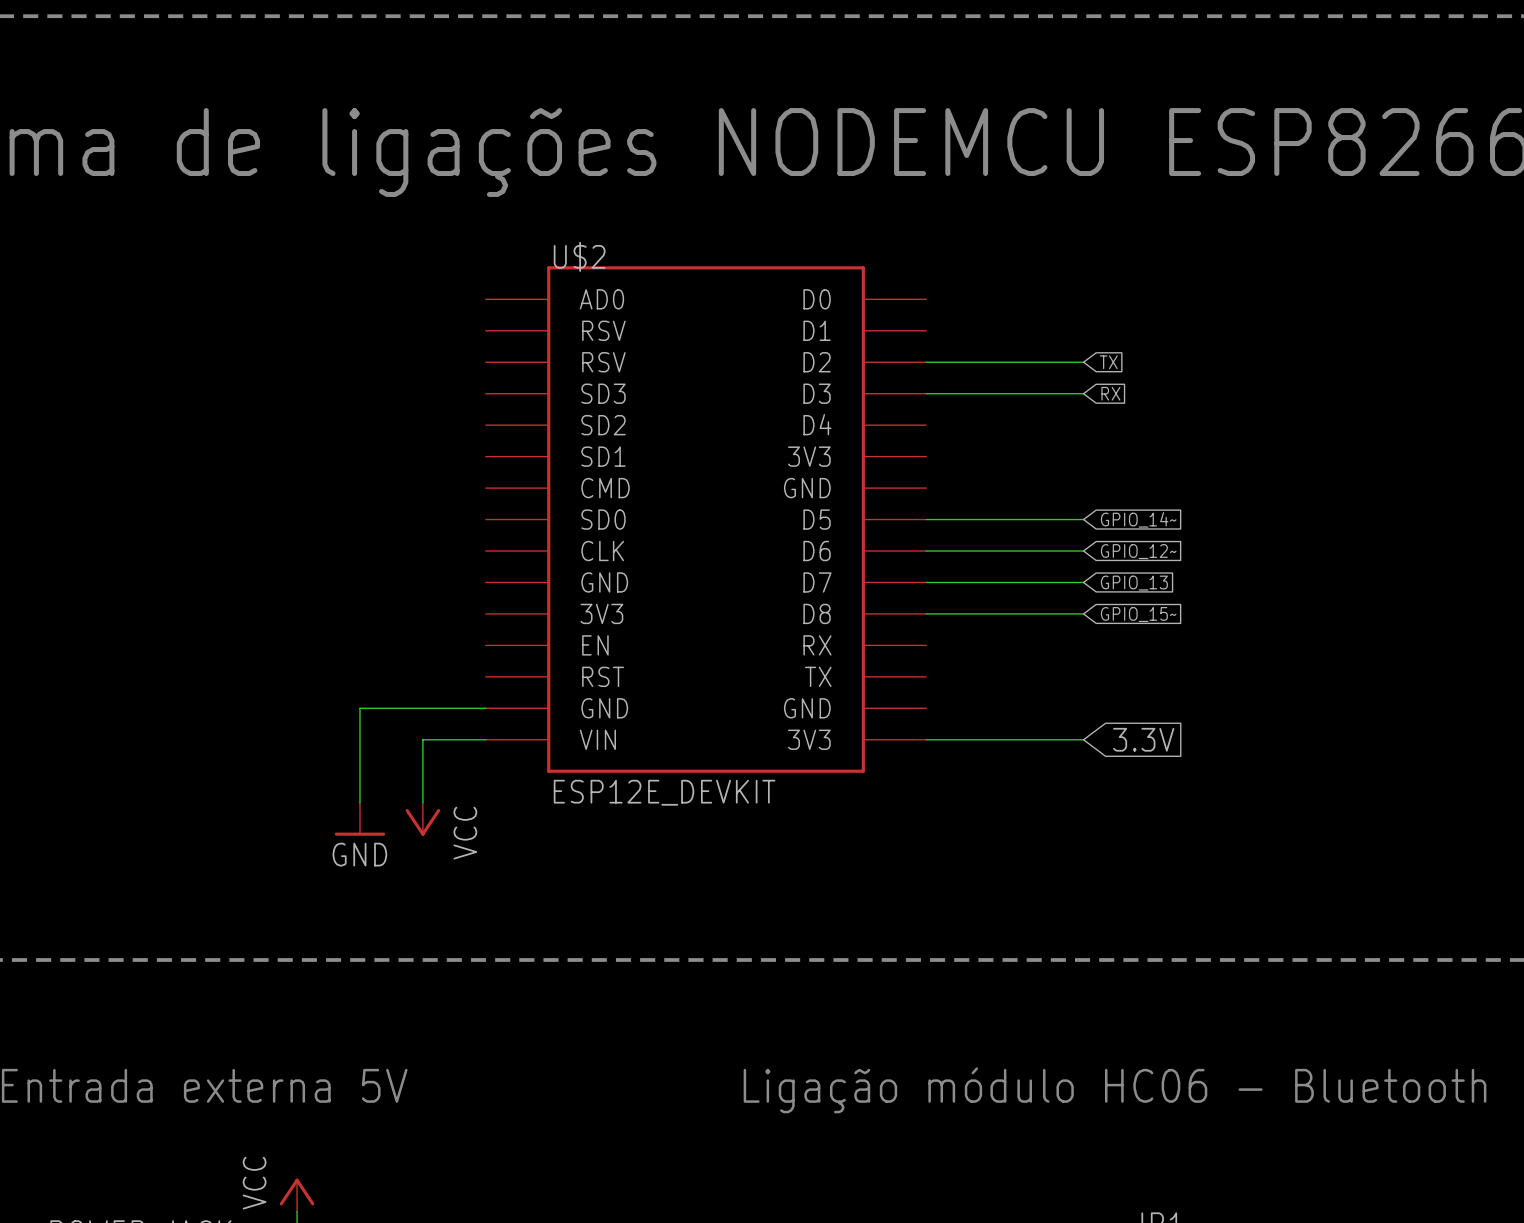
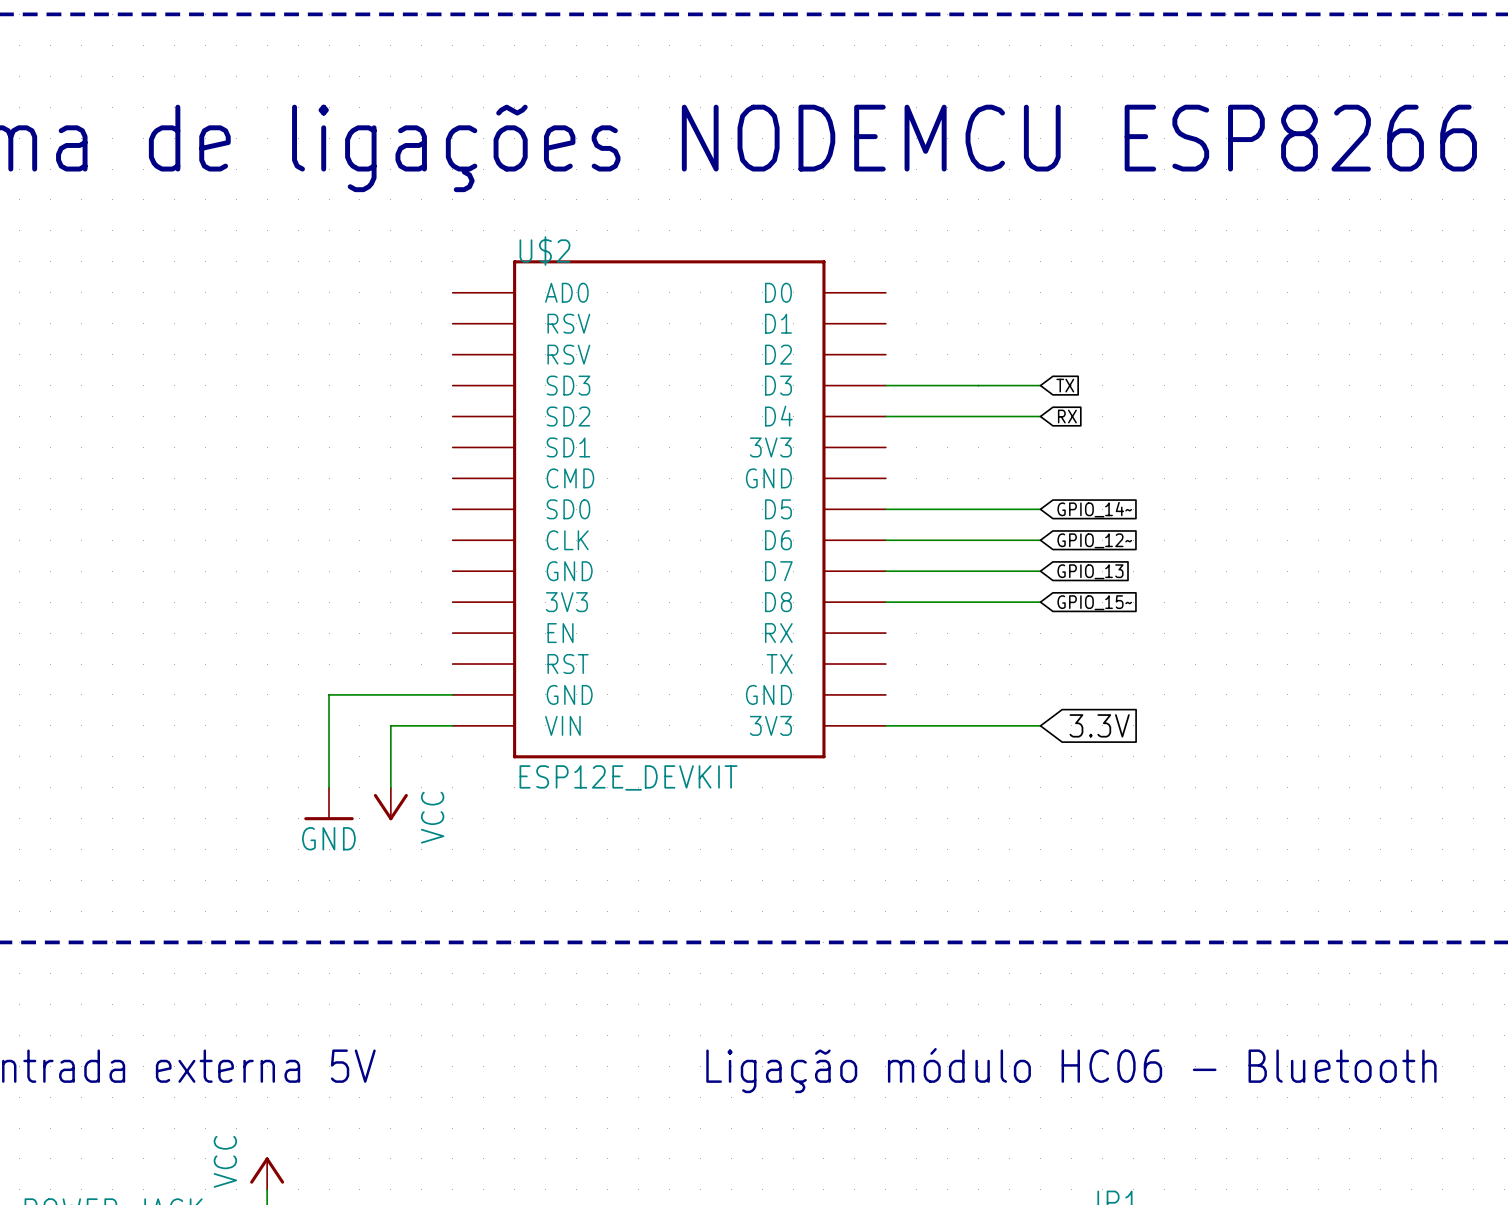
wire: (926, 362) (1083, 362) -> (885, 416) (1040, 416)
global label: TX (1108, 362) -> none
global label: RX (1110, 393) -> TX (1065, 385)
global label: none -> RX (1067, 416)

